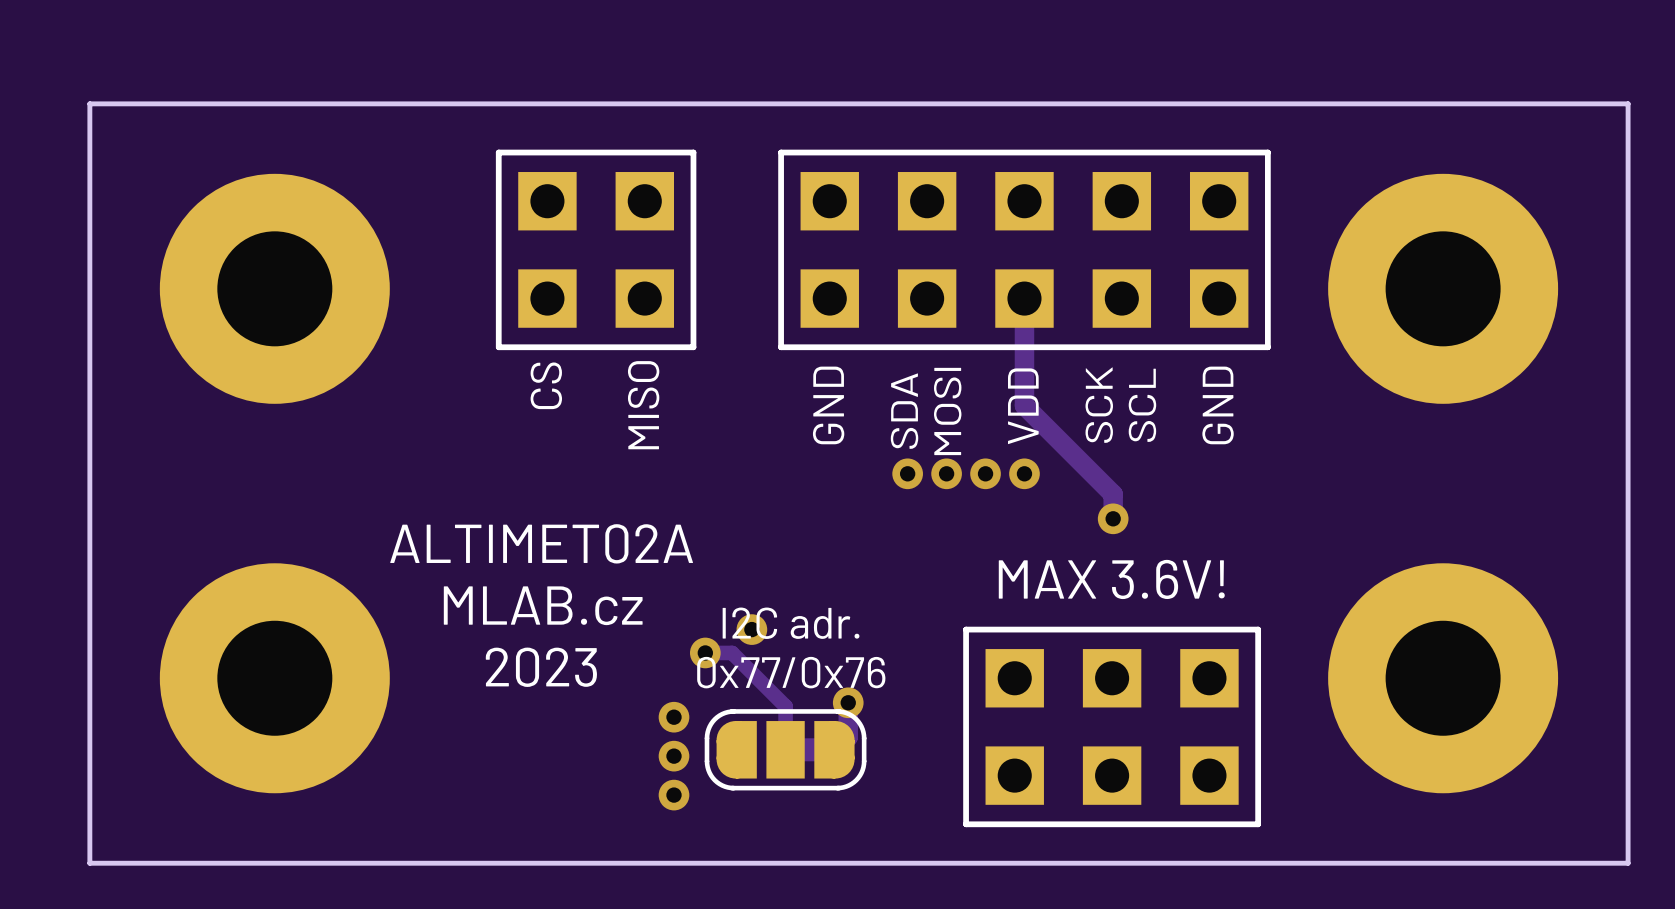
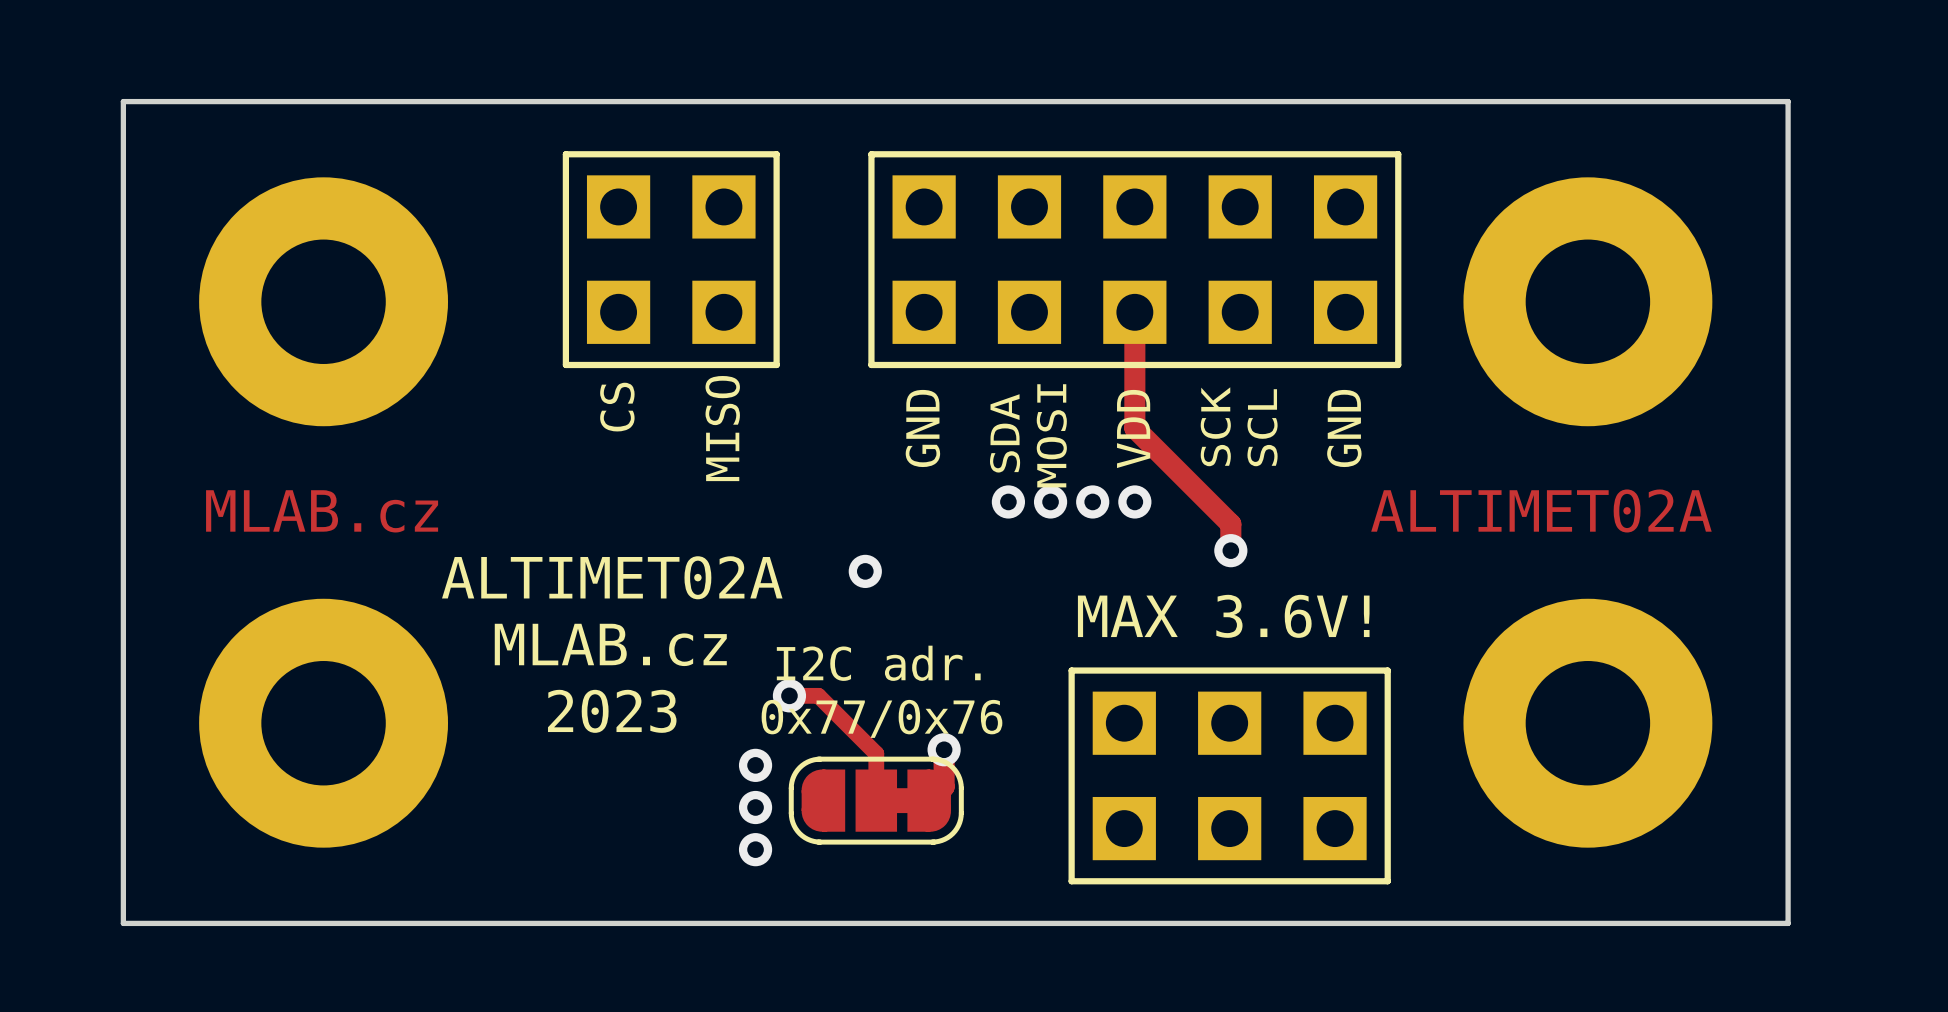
text: none -> MLAB.cz (322, 511)
text: none -> ALTIMET02A (1541, 510)
via position: (751, 629) -> (865, 571)

